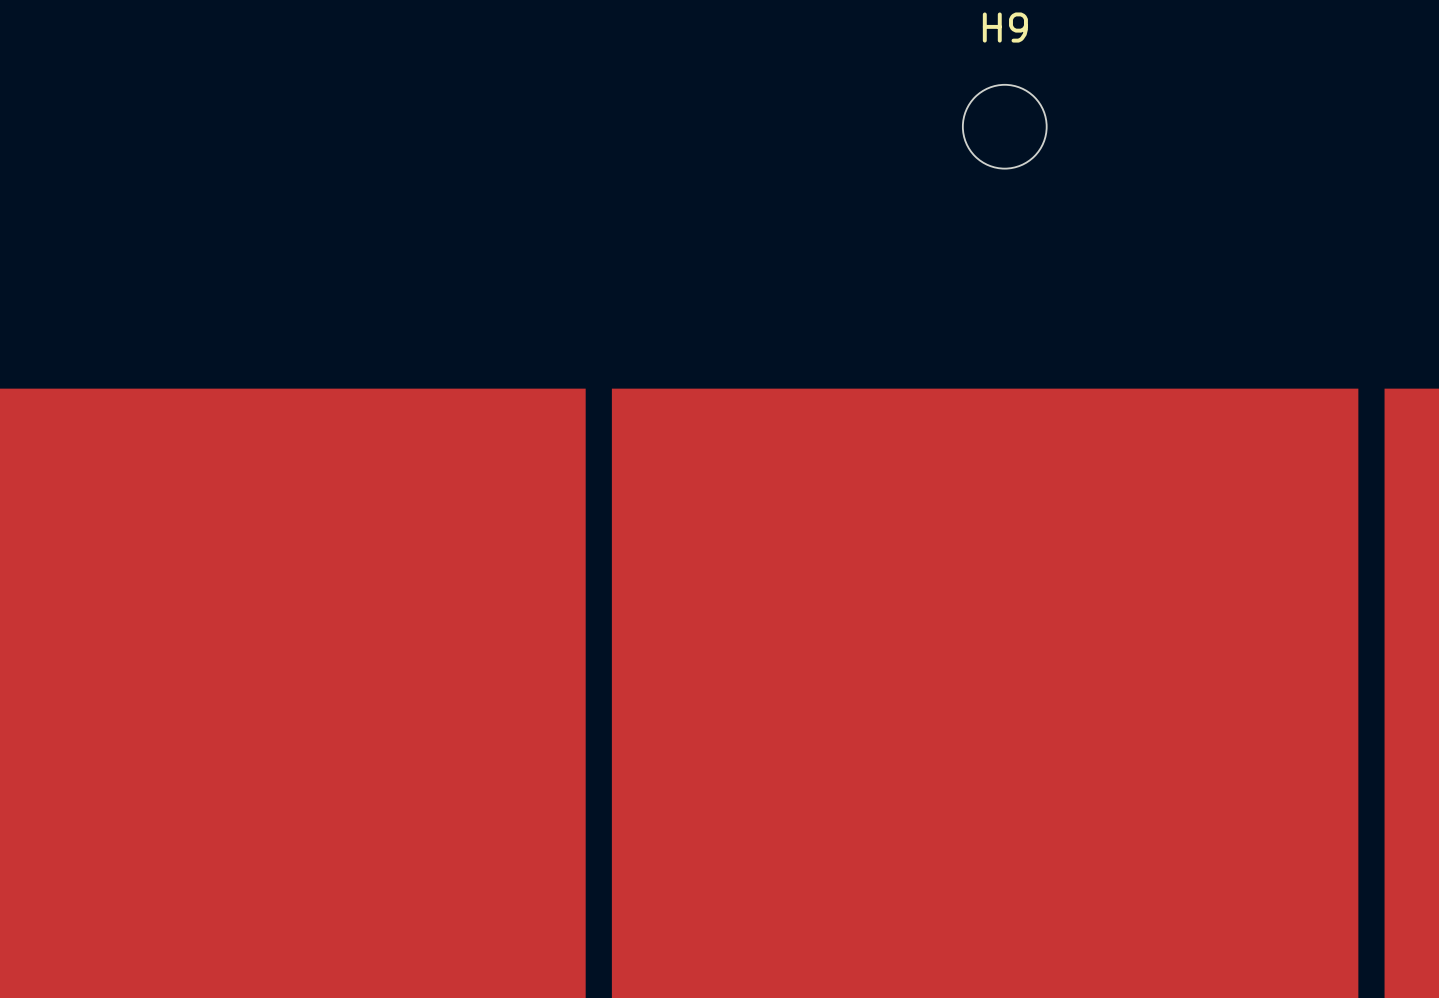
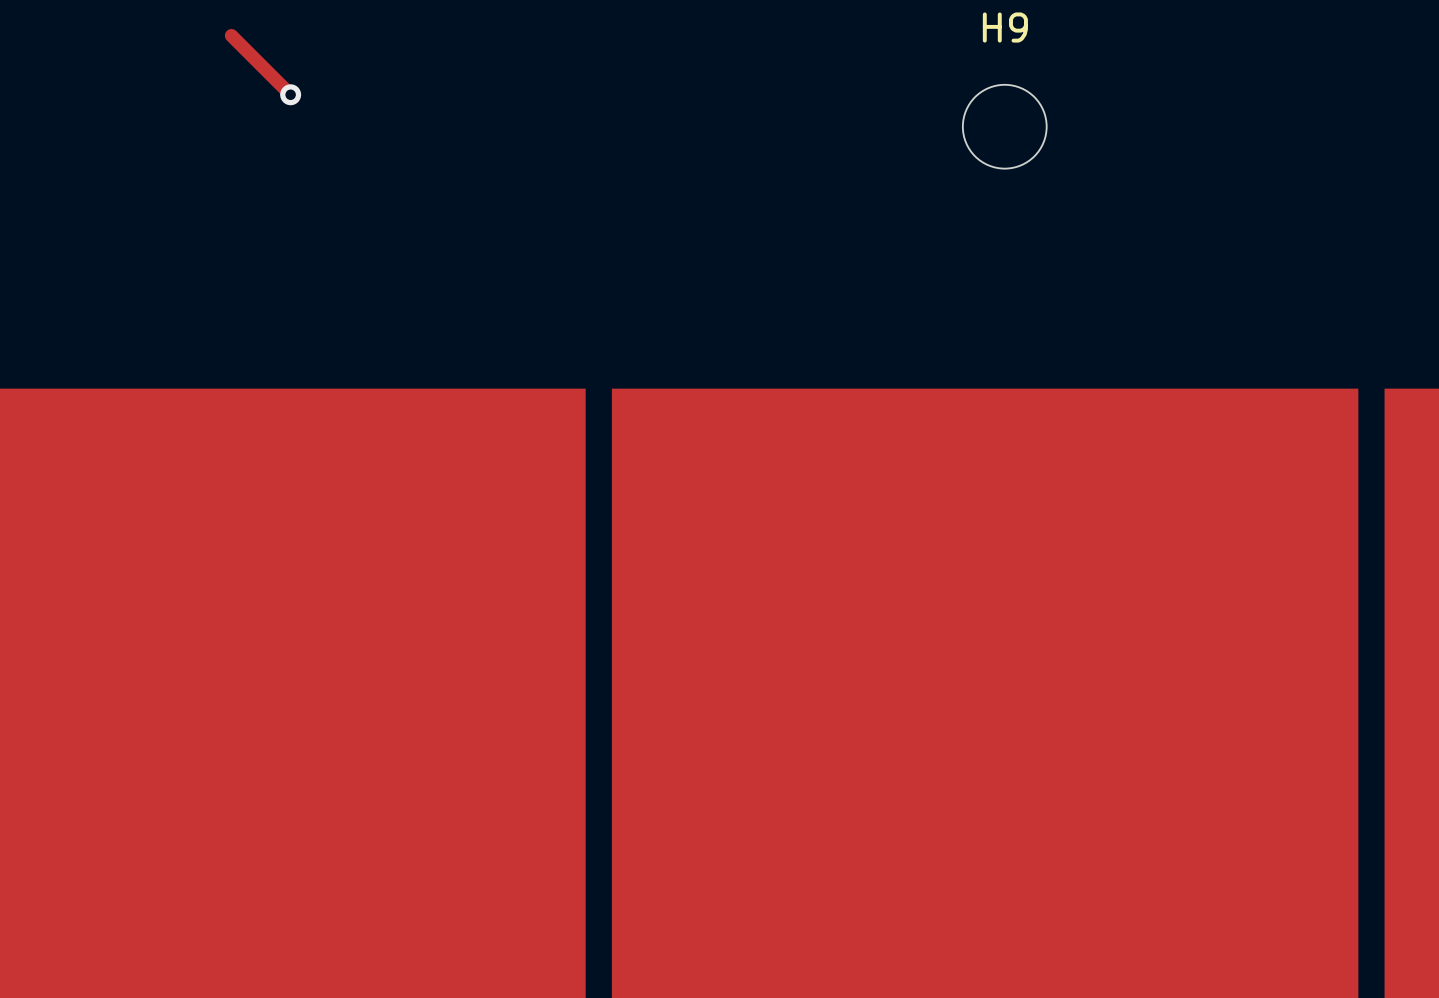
track: none -> (231, 35) (290, 94)
via: none -> (290, 94)

